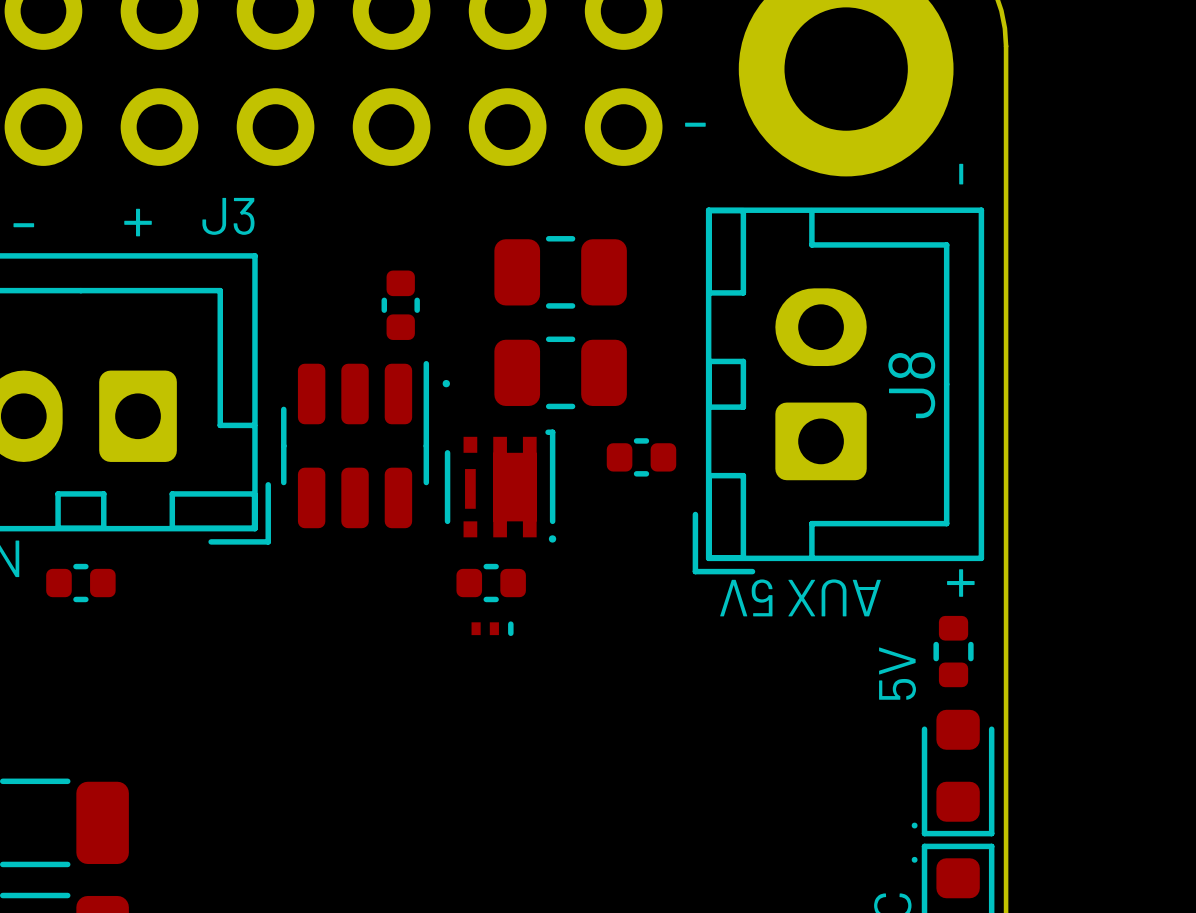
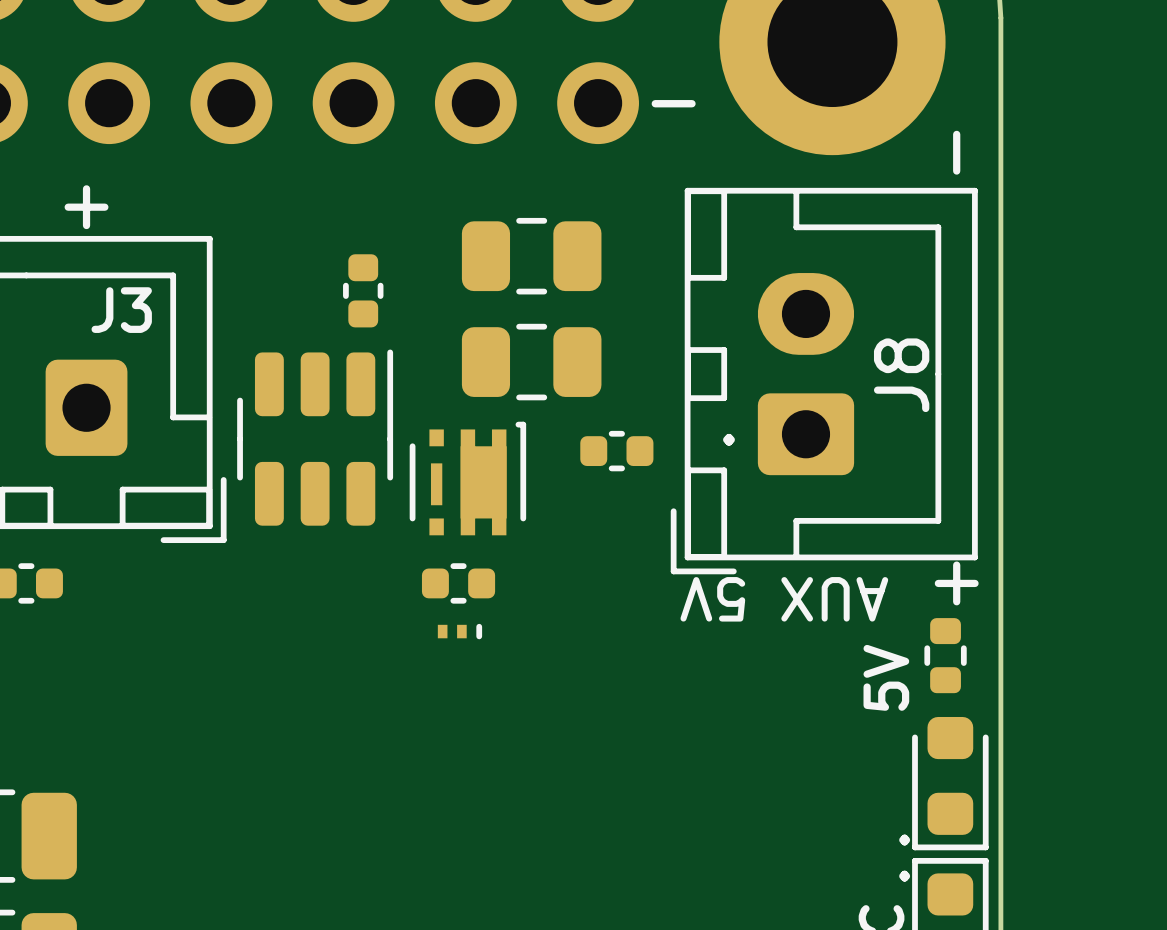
J3 name position: J3 (228, 216) -> J3 (121, 310)
text: . (446, 383) -> none
text: none -> . (728, 439)
text: . (552, 538) -> none

